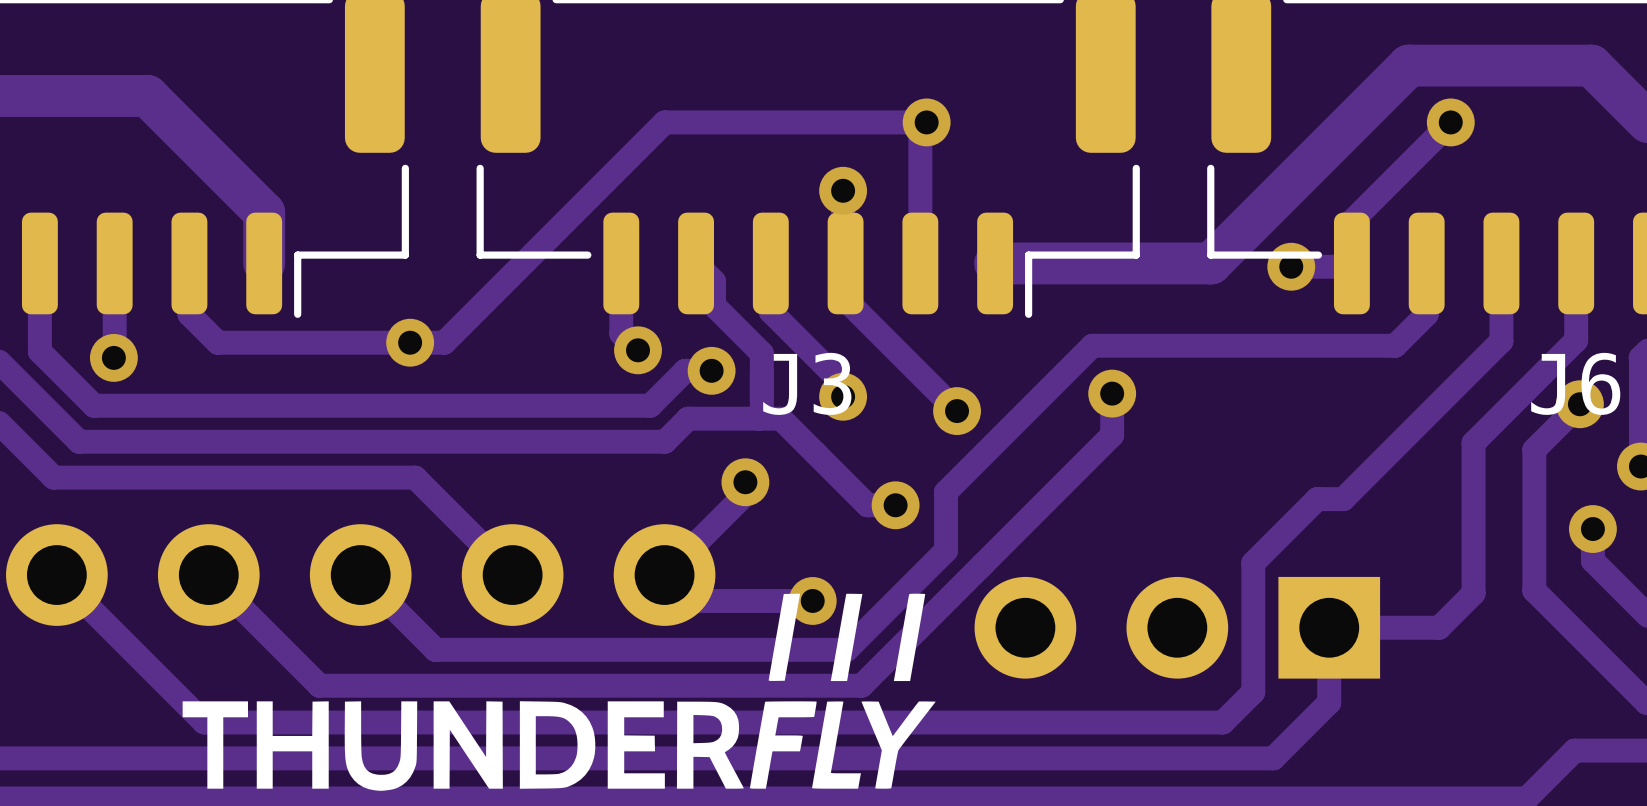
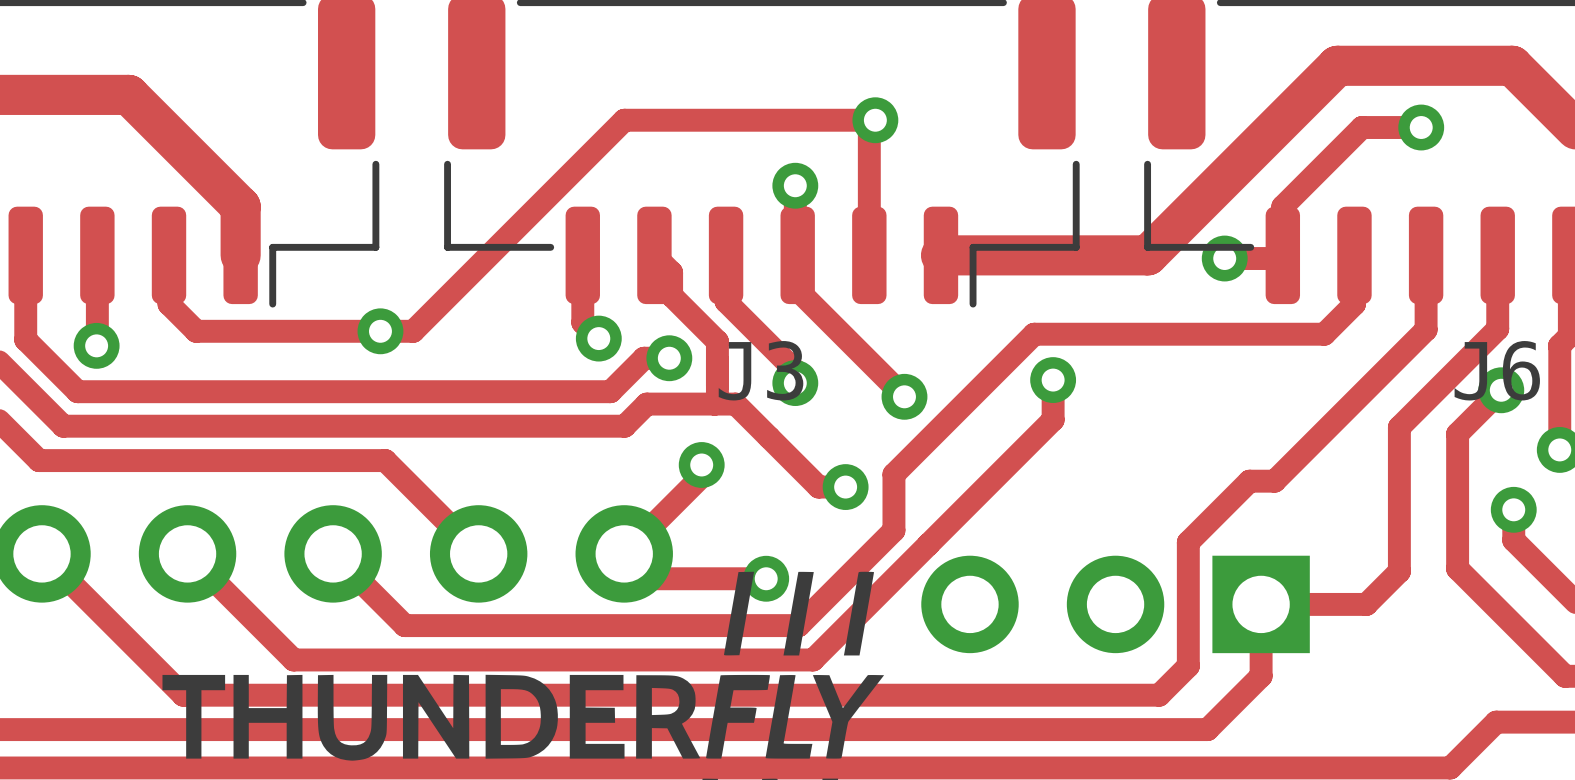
track: (1450, 122) (1351, 221) -> (1421, 127) (1361, 127) (1282, 206) (1282, 214)
via position: (1450, 122) -> (1421, 127)

